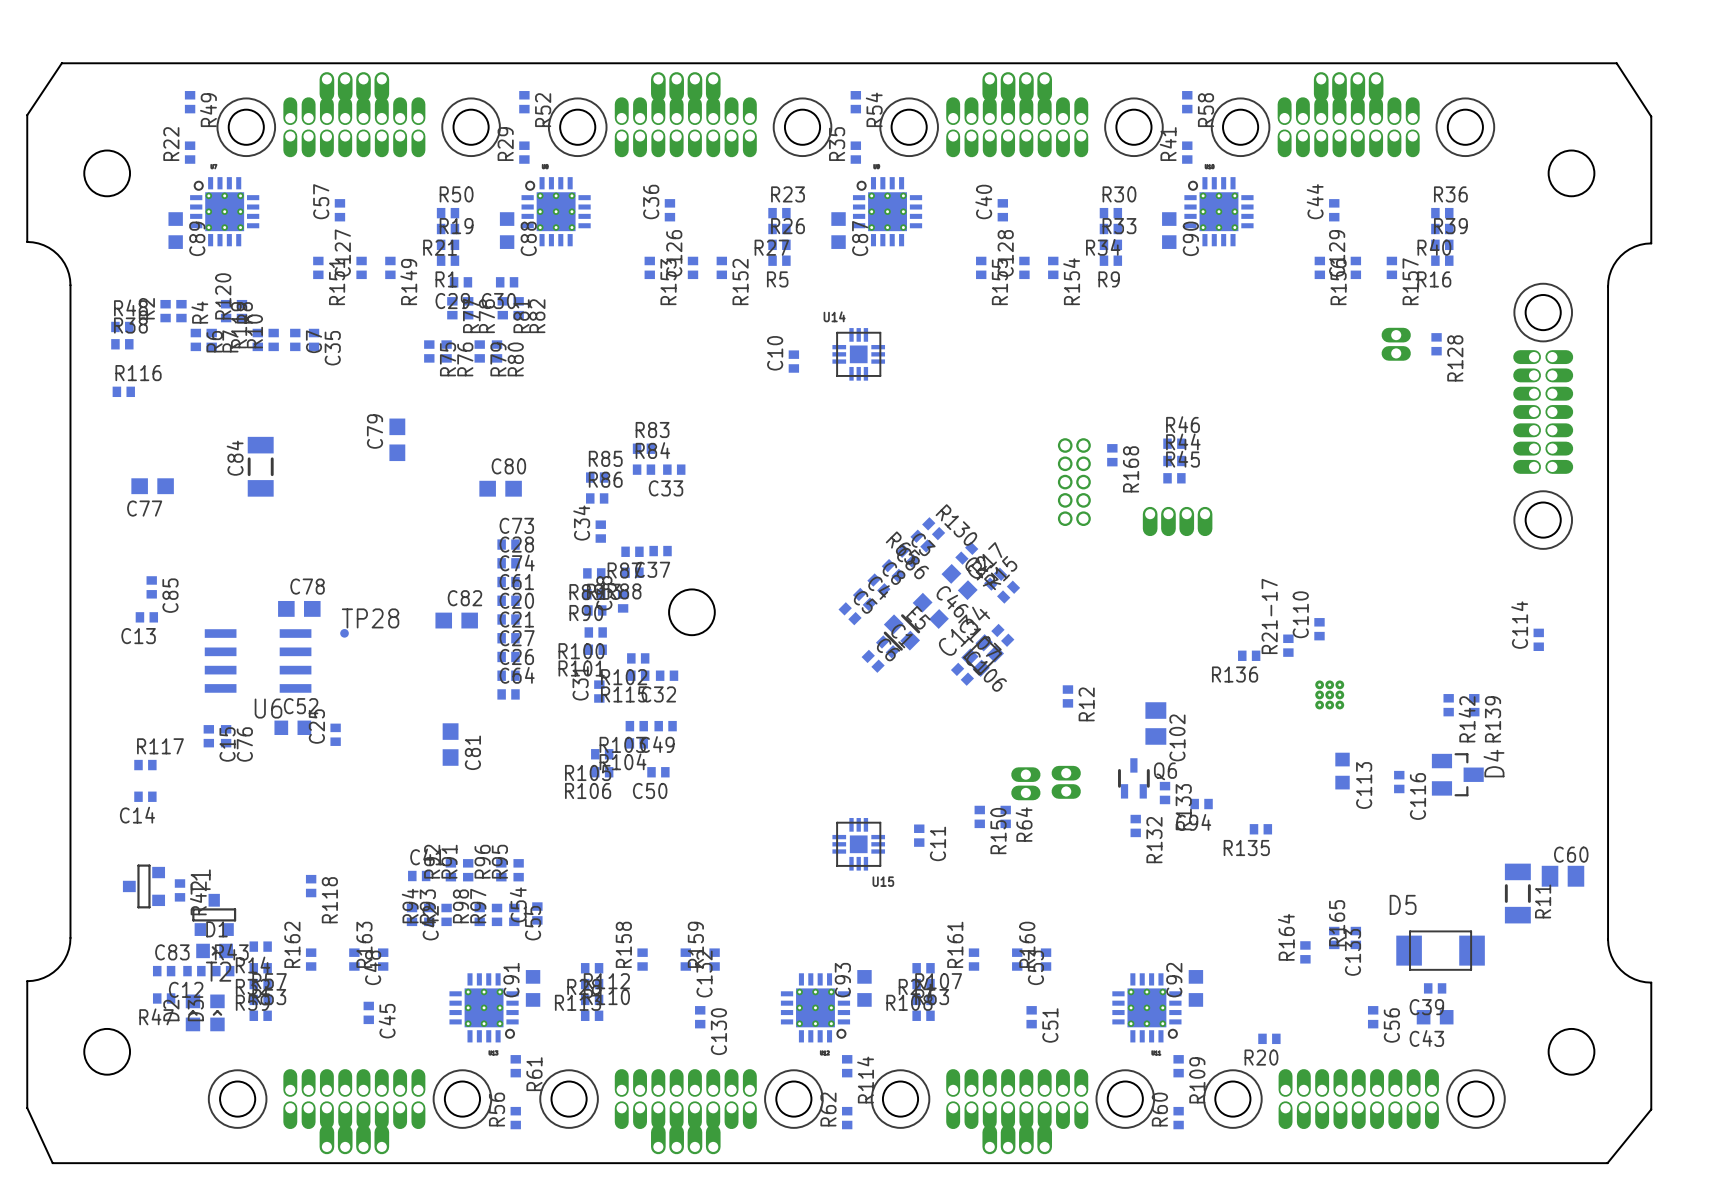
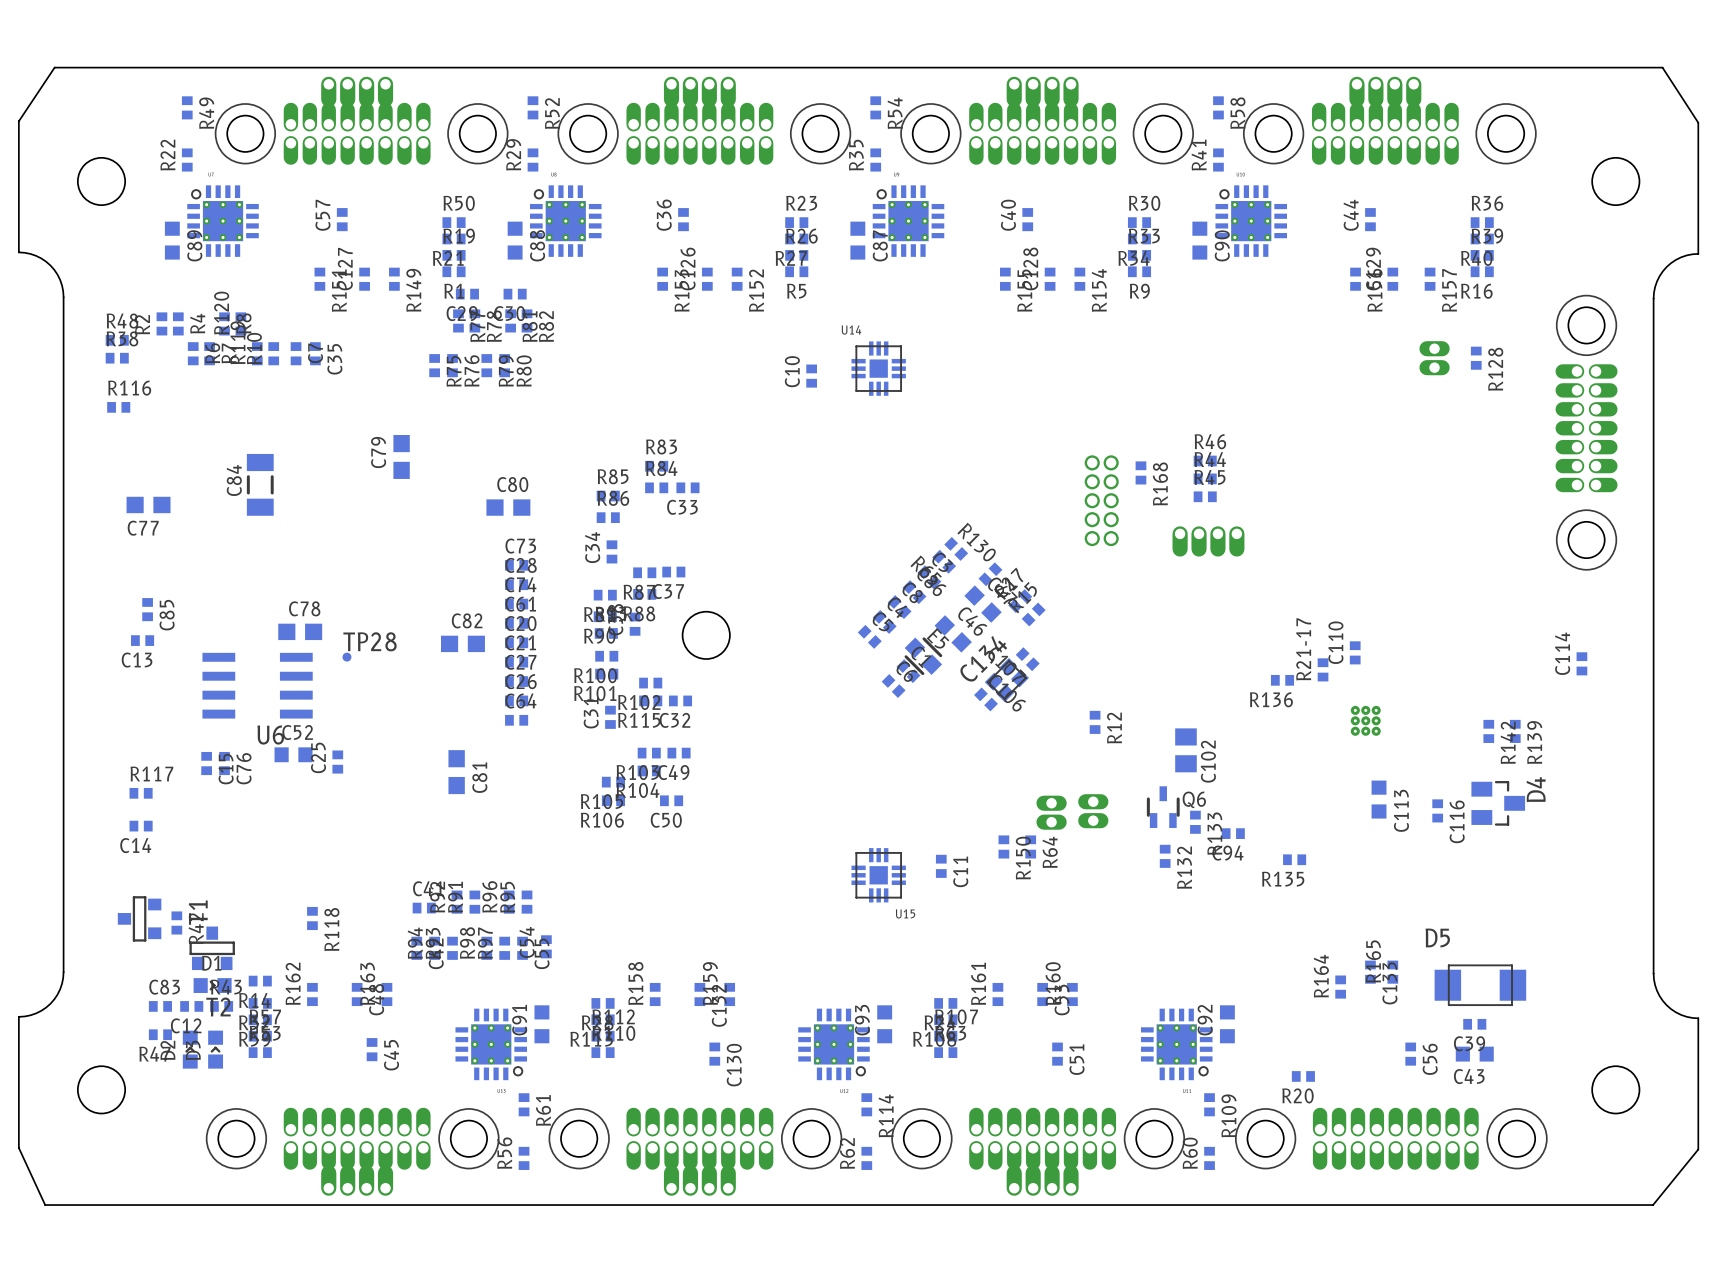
C60: (1562, 876) -> none
R11: (1517, 893) -> none

